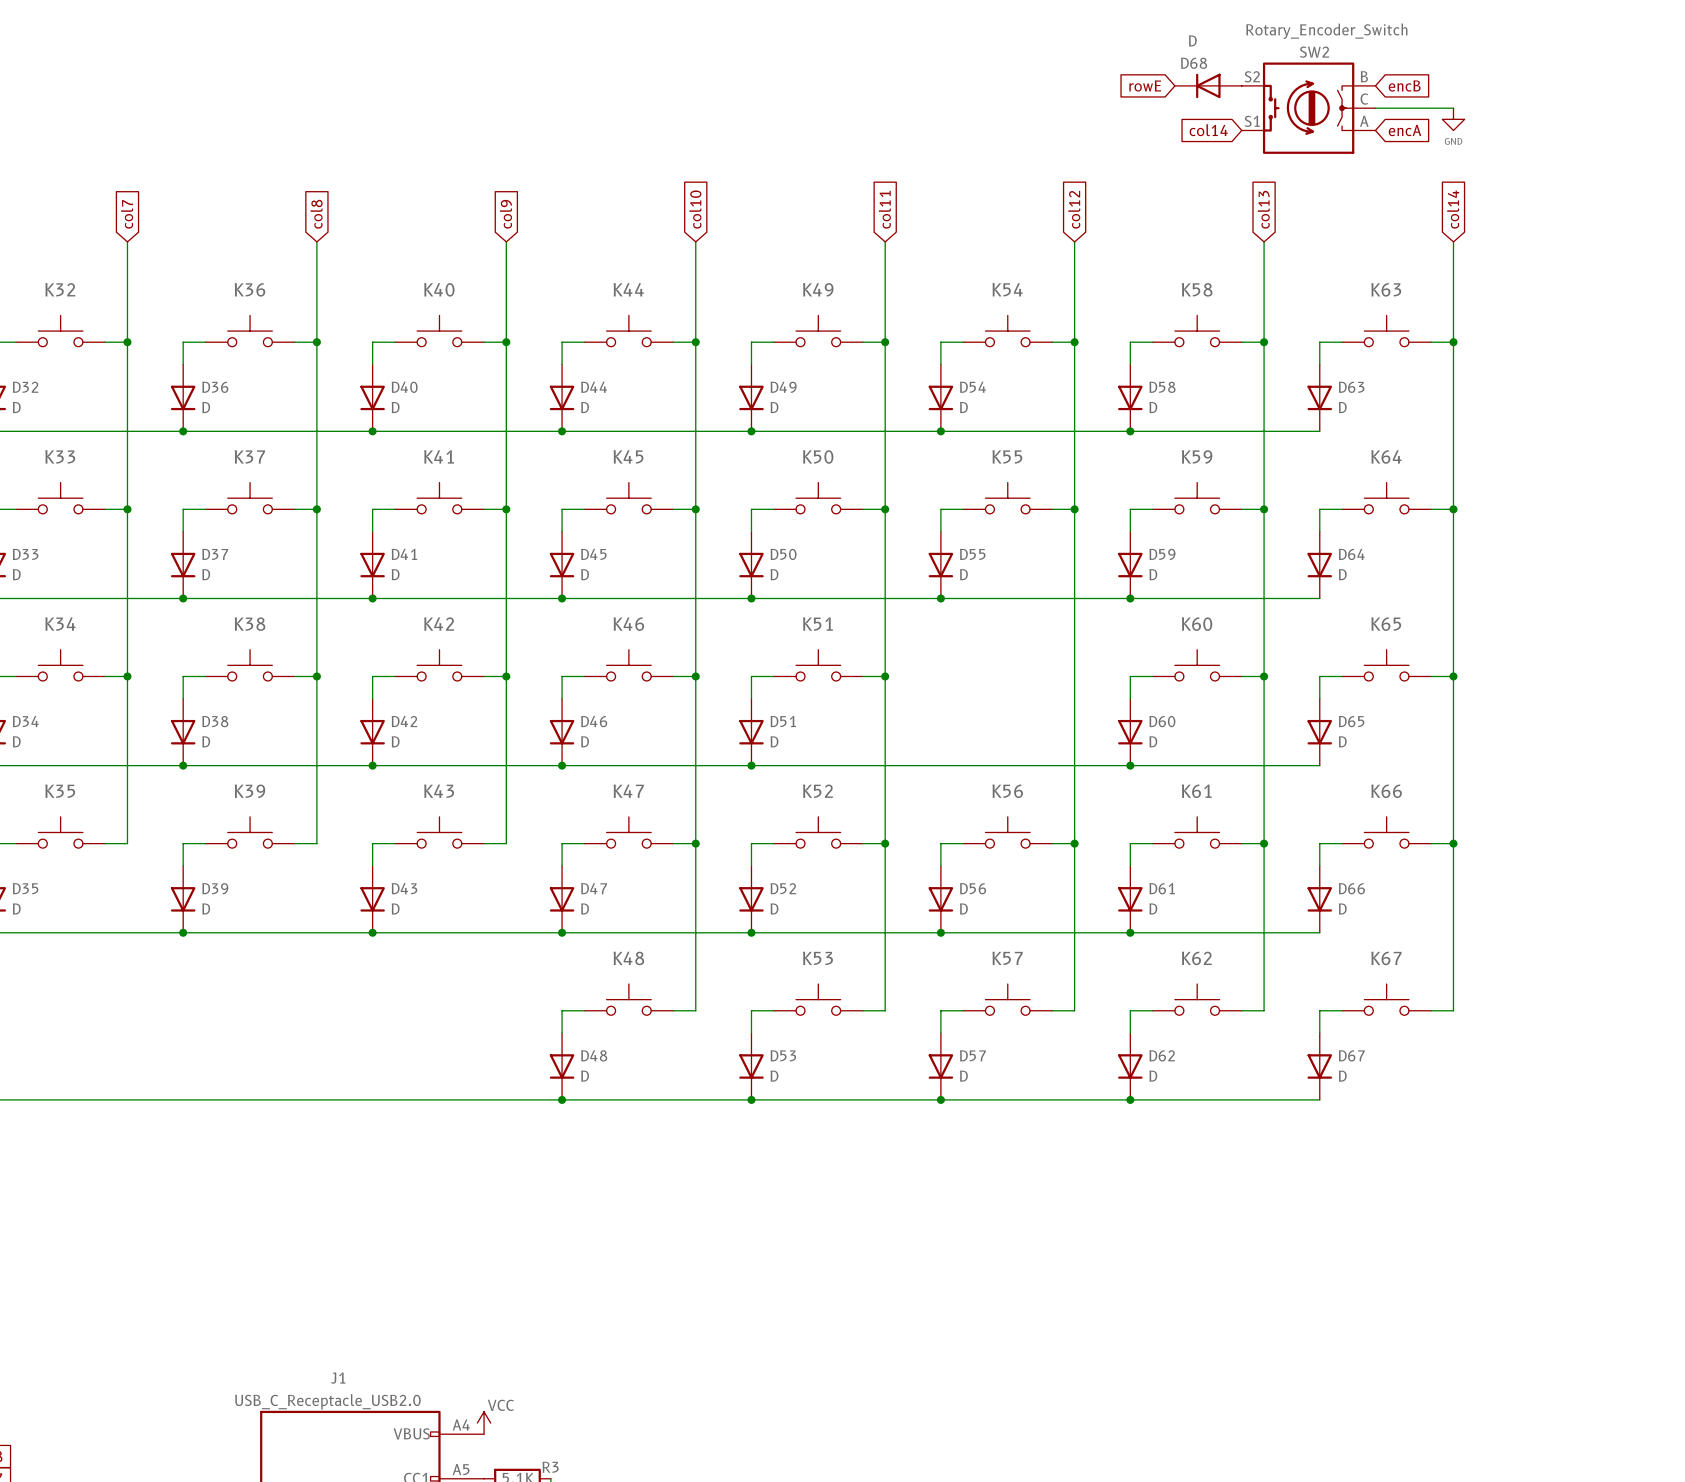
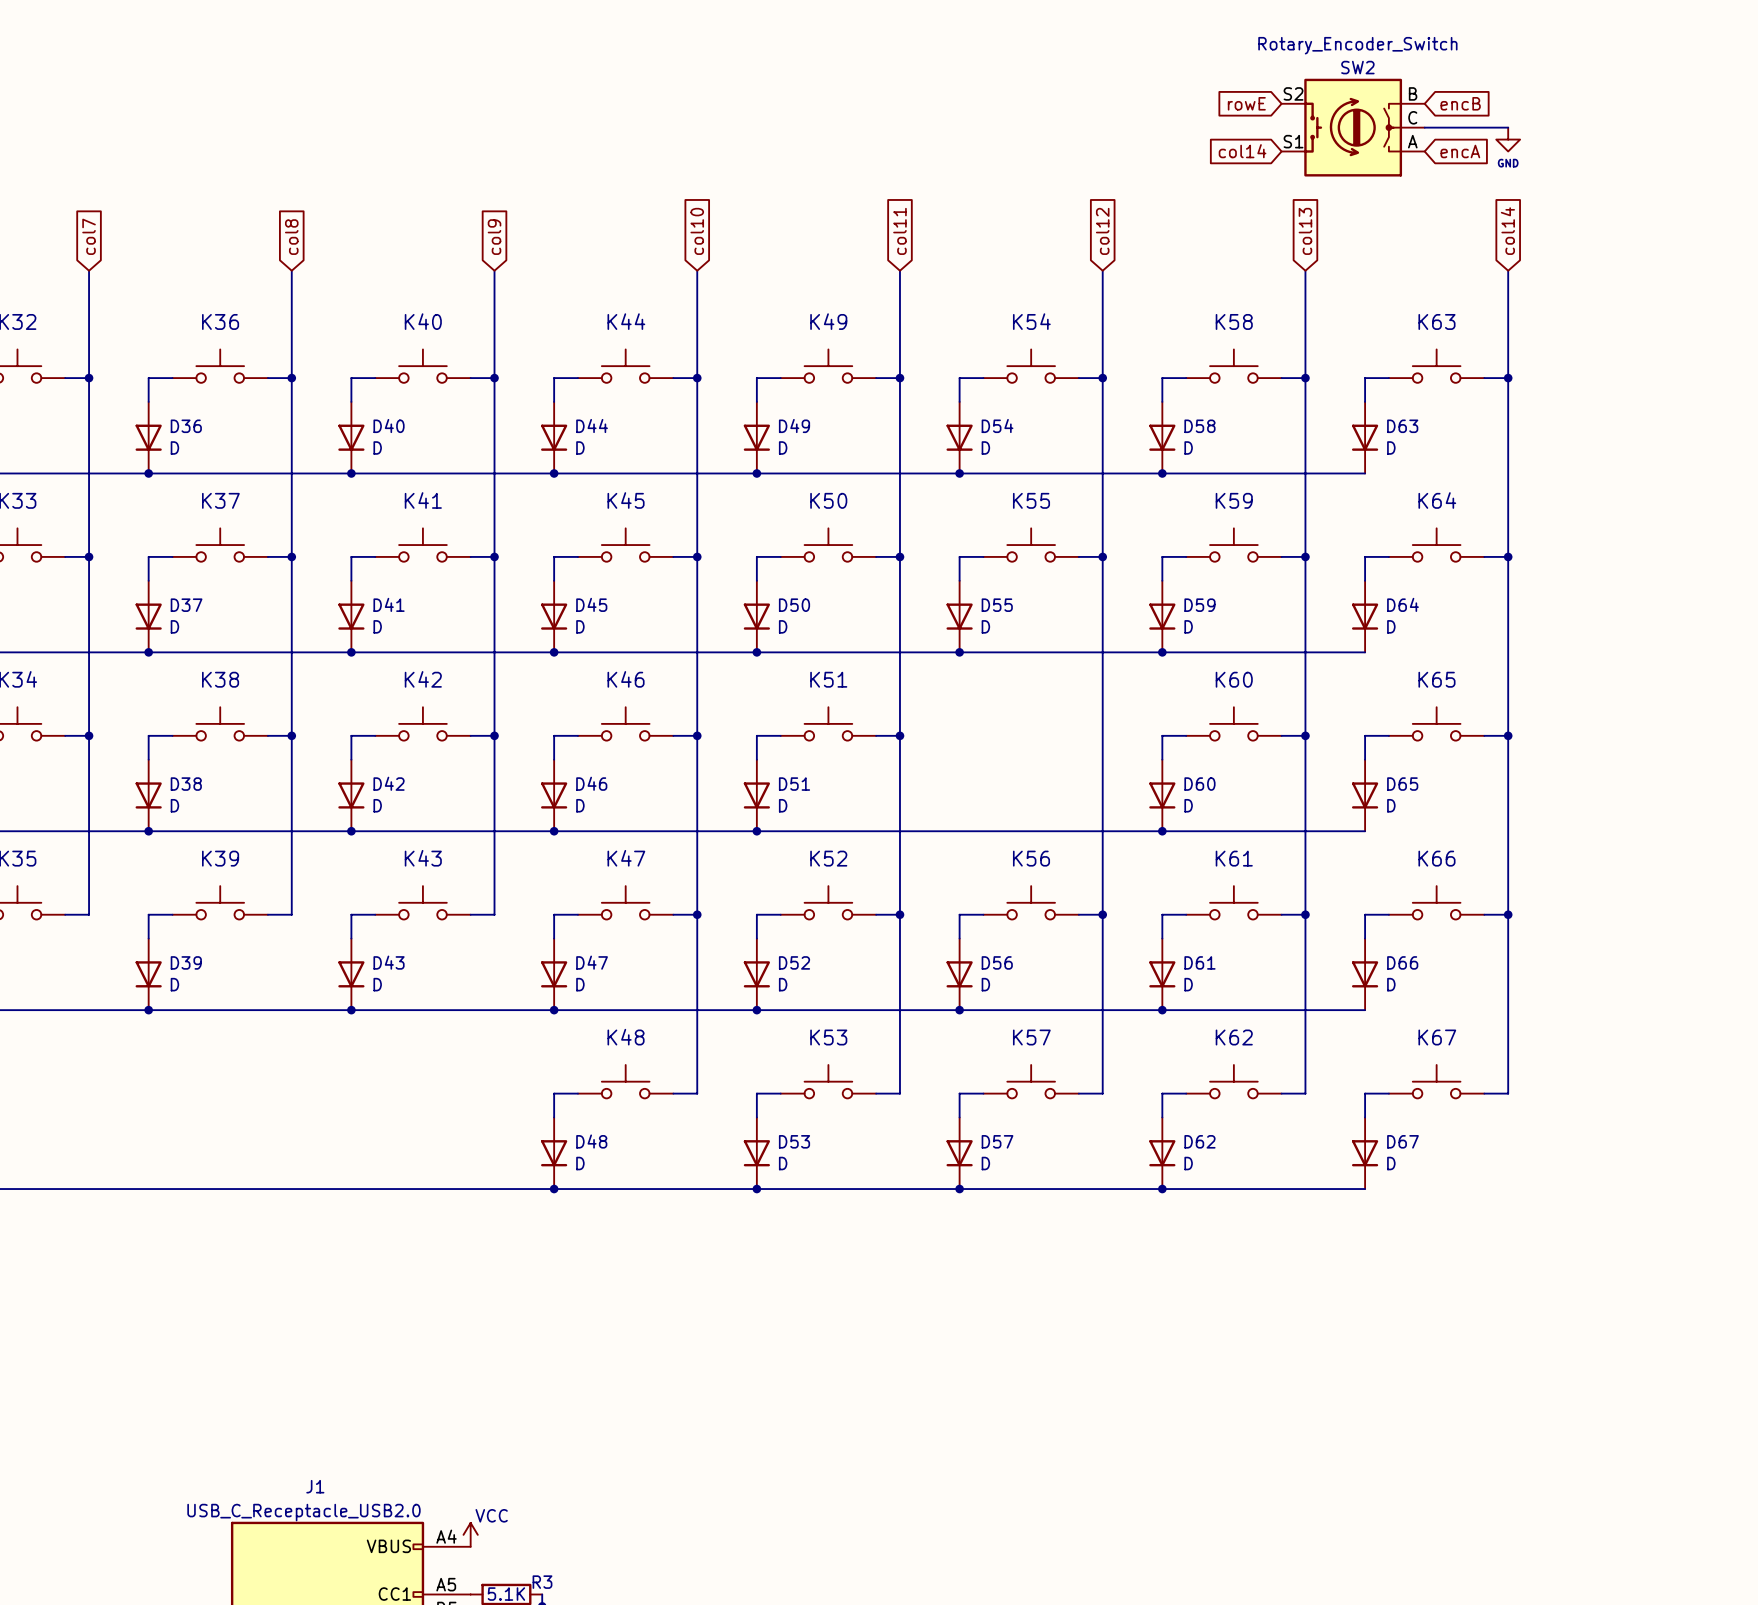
D68: D (1208, 85) -> none
global label position: rowE (1145, 86) -> rowE (1246, 103)

